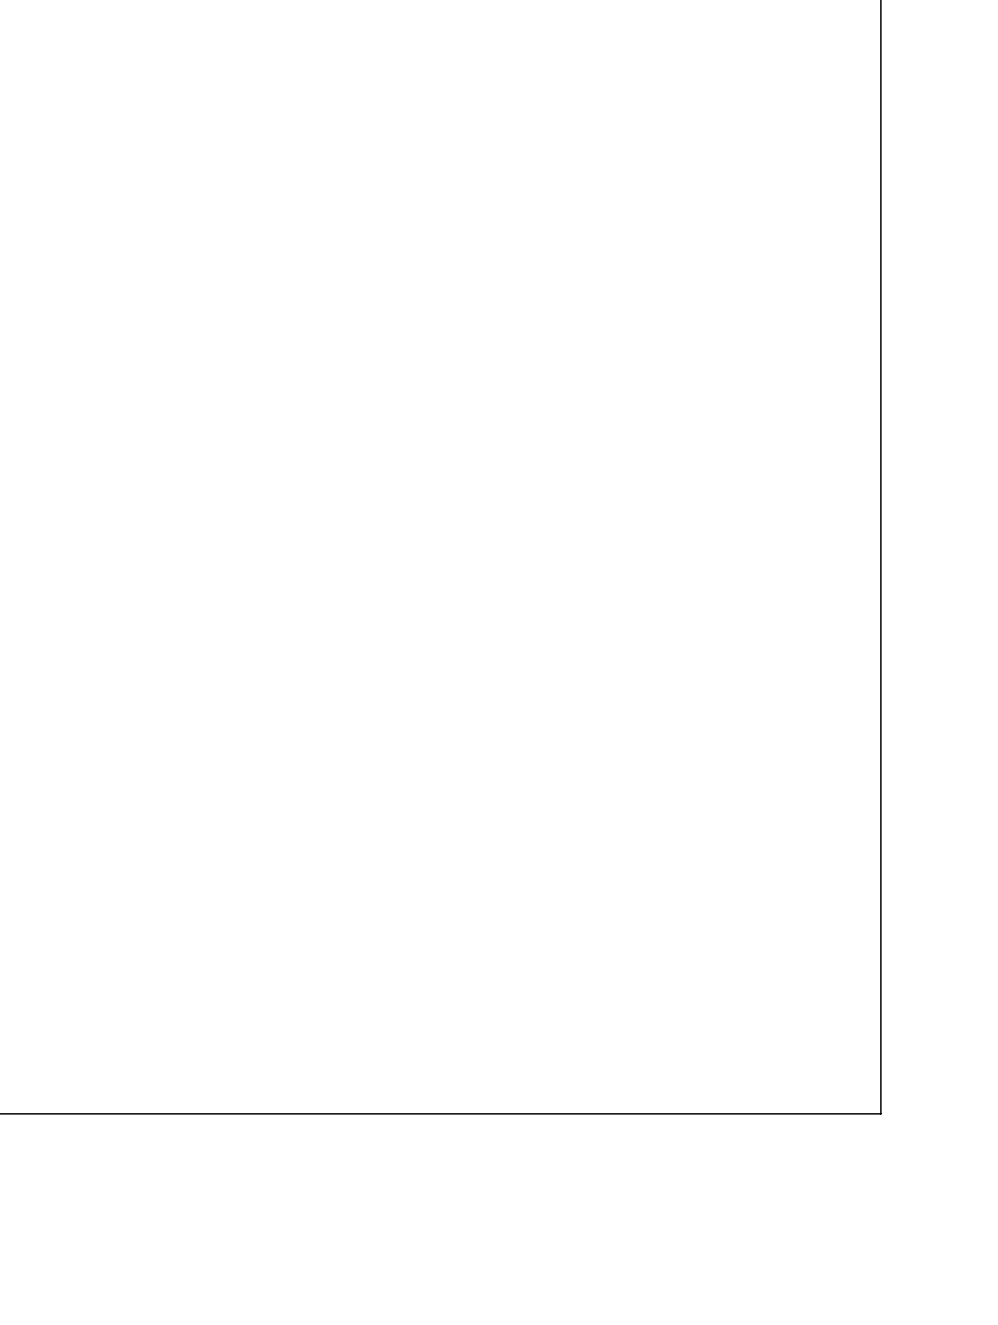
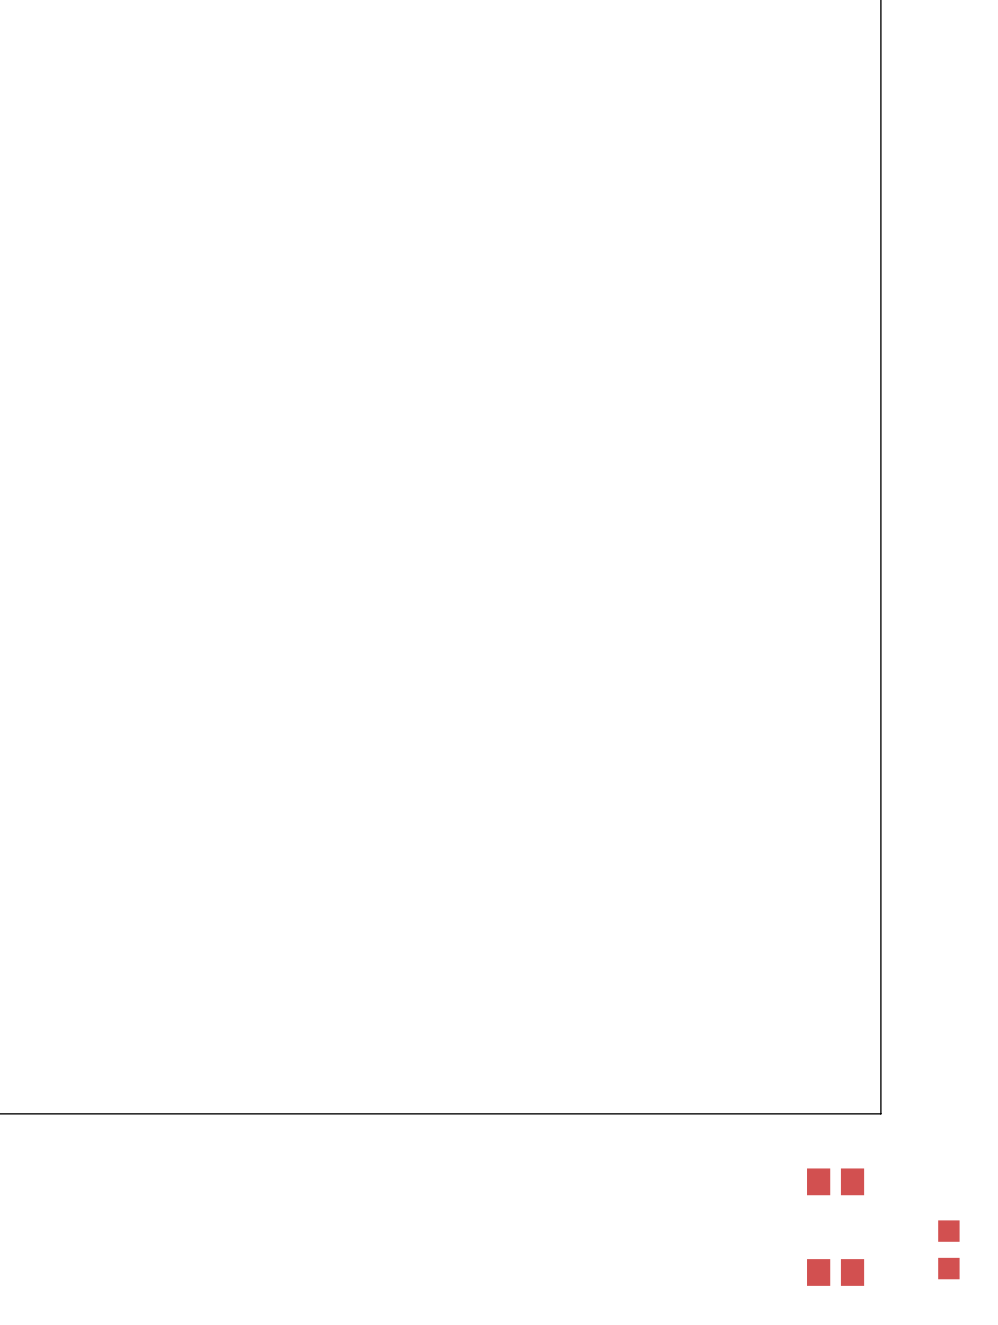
part: none -> (835, 1181)
part: none -> (948, 1249)
part: none -> (835, 1272)

